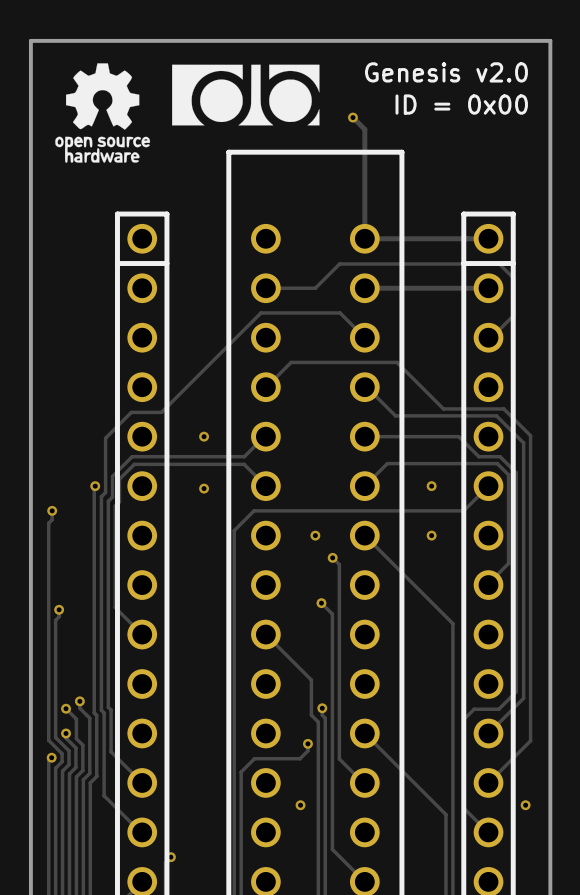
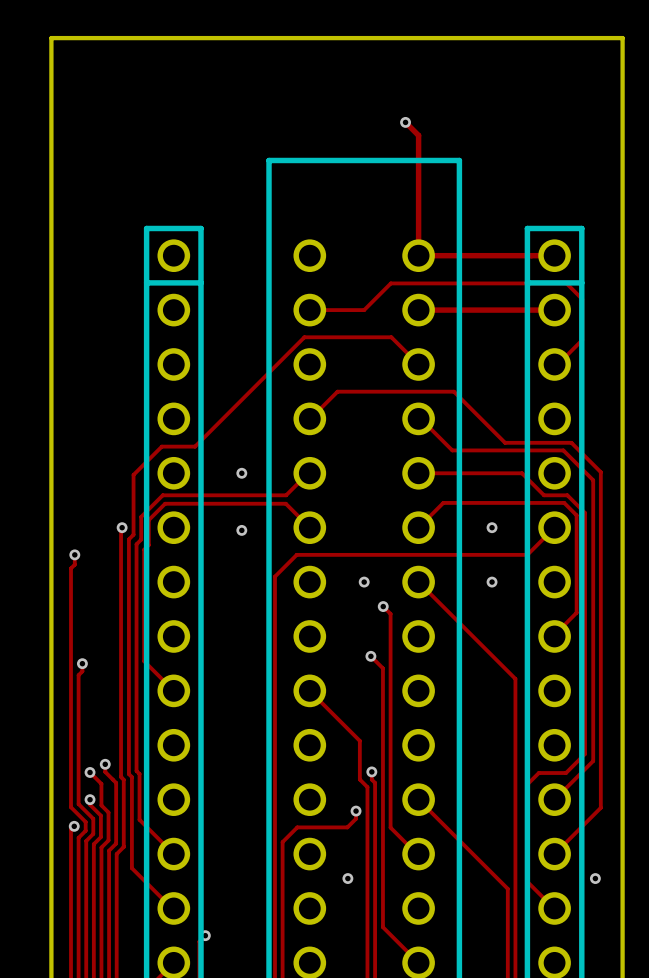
drawing: [55, 63, 320, 163] -> none
text: Genesis v2.0 (446, 72) -> none
text: ID = 0x00 (461, 104) -> none

